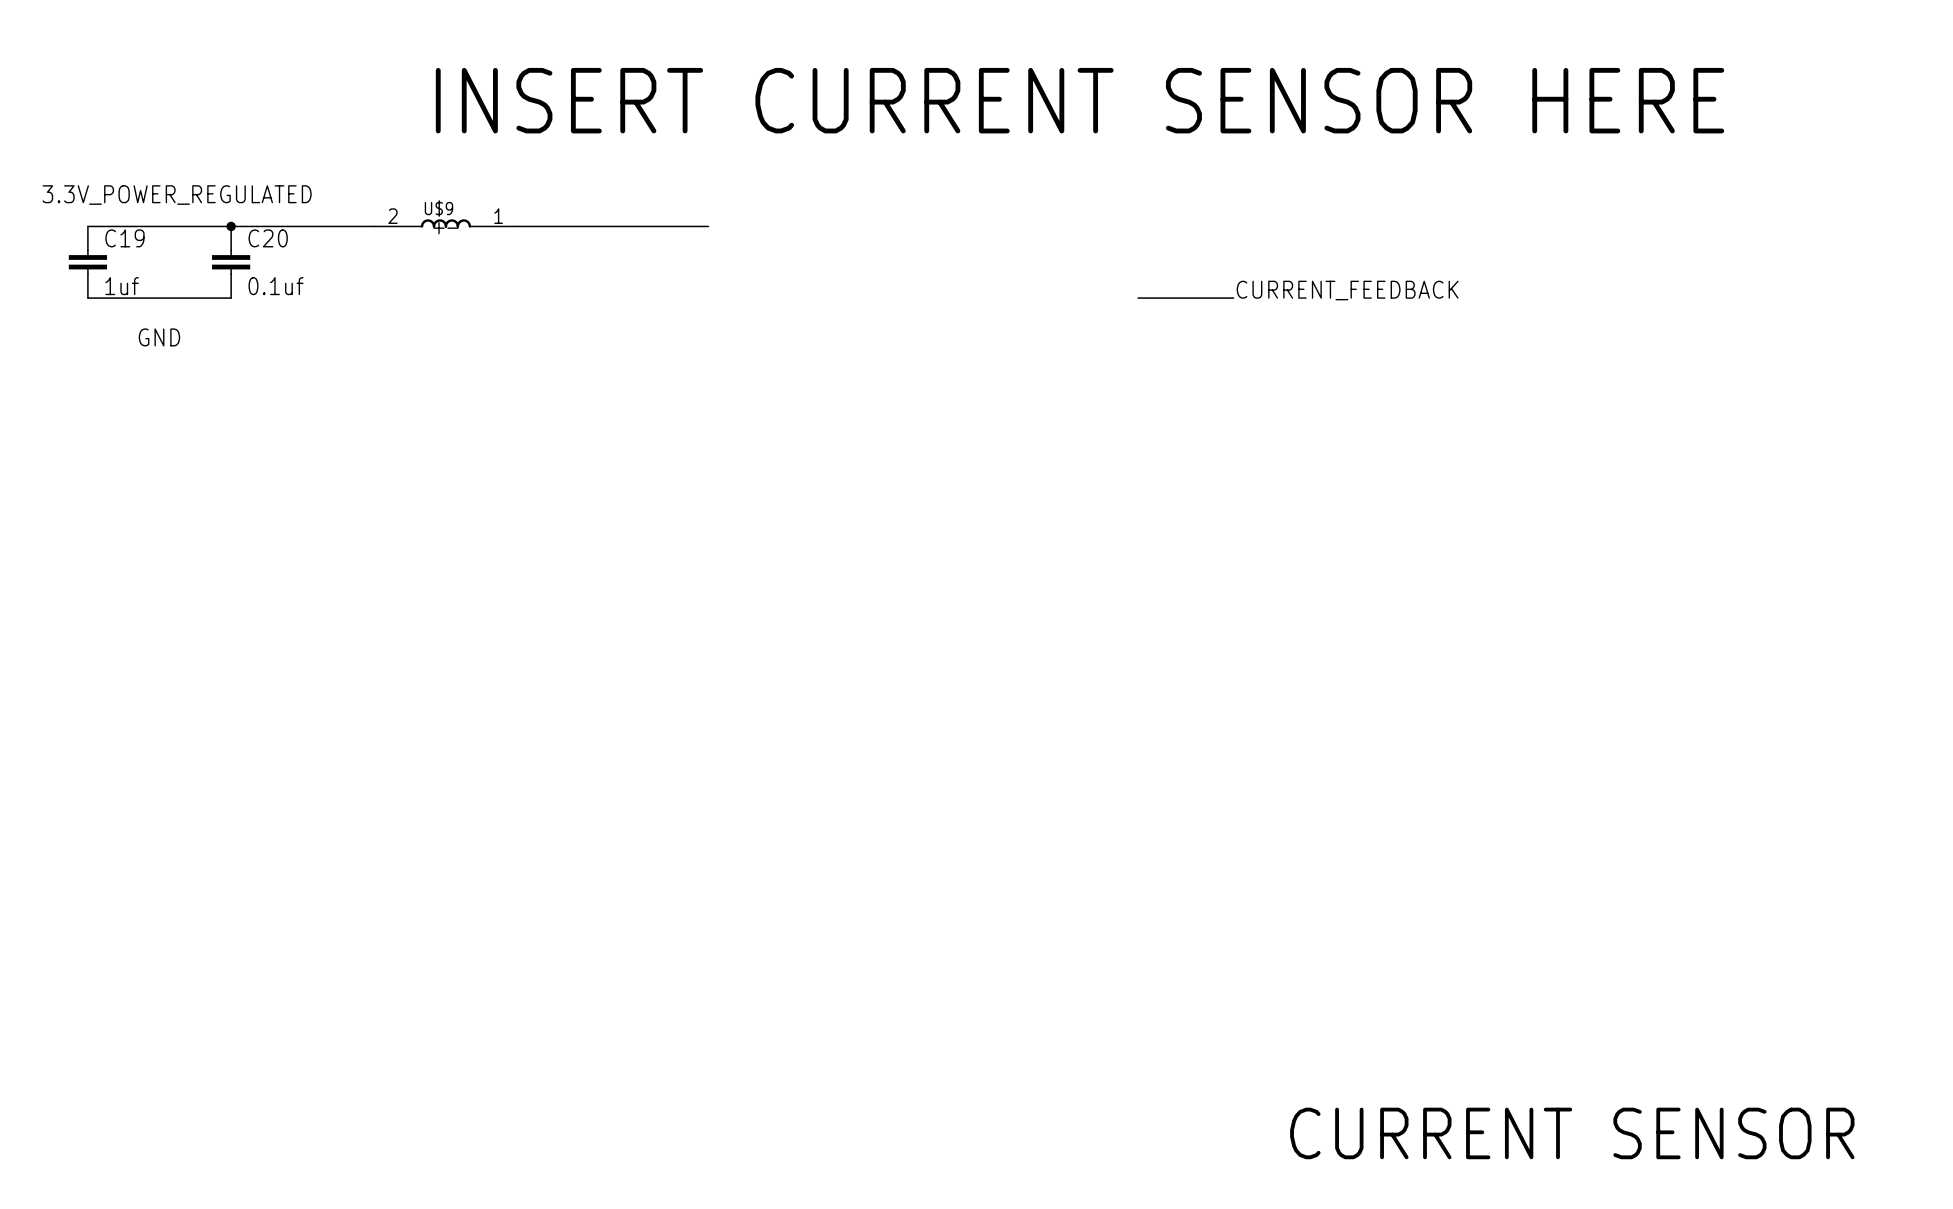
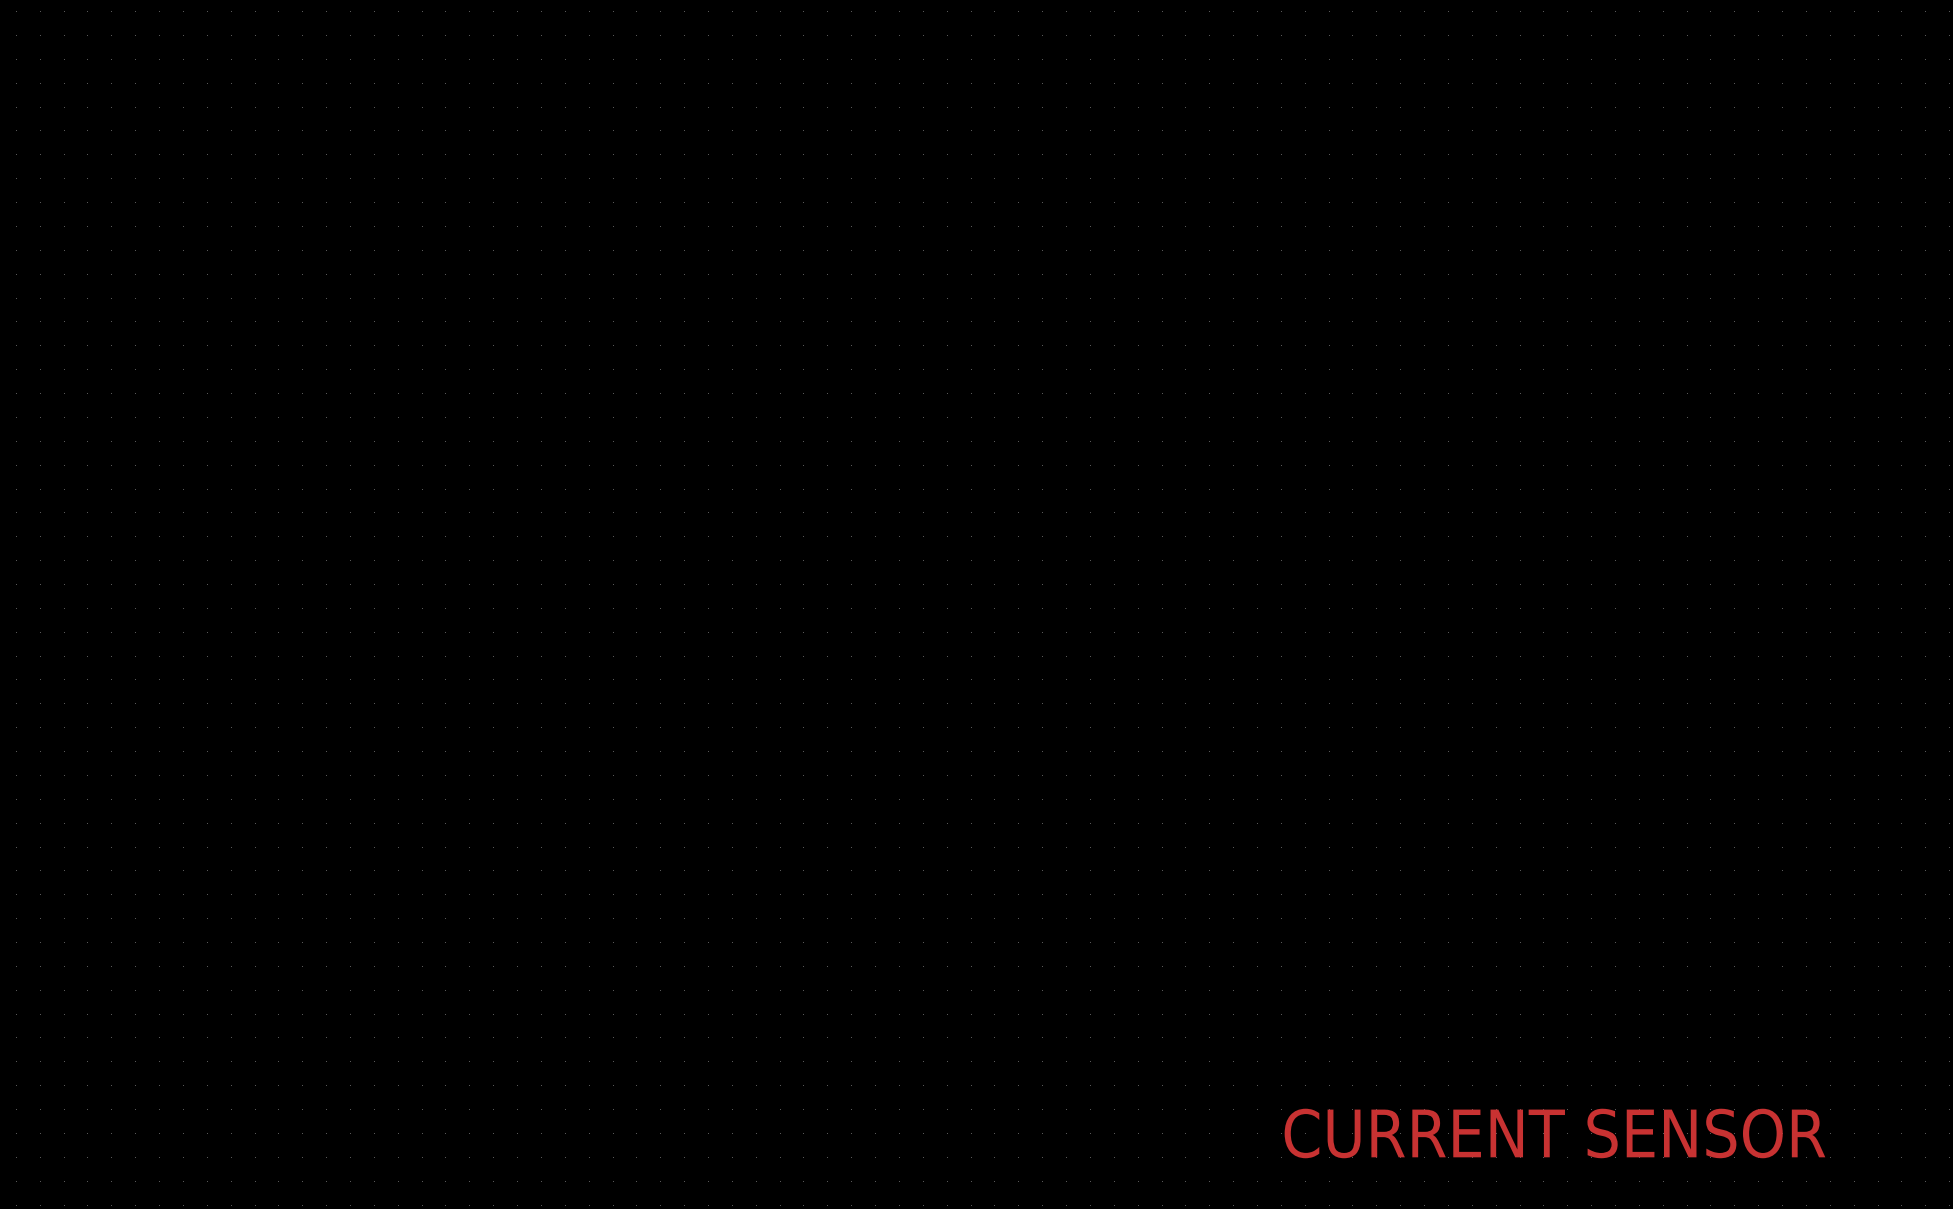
text: INSERT CURRENT SENSOR HERE (1080, 100) -> none
label: 3.3V_POWER_REGULATED (177, 195) -> none
U$9: (445, 223) -> none
wire: (87, 226) (374, 226) -> none
junction: (231, 226) -> none
wire: (517, 226) (708, 226) -> none
C19: 1uf (87, 262) -> none
C20: 0.1uf (231, 262) -> none
label: CURRENT_FEEDBACK (1347, 290) -> none
wire: (87, 298) (231, 298) -> none
wire: (1138, 298) (1233, 298) -> none
label: GND (159, 337) -> none

